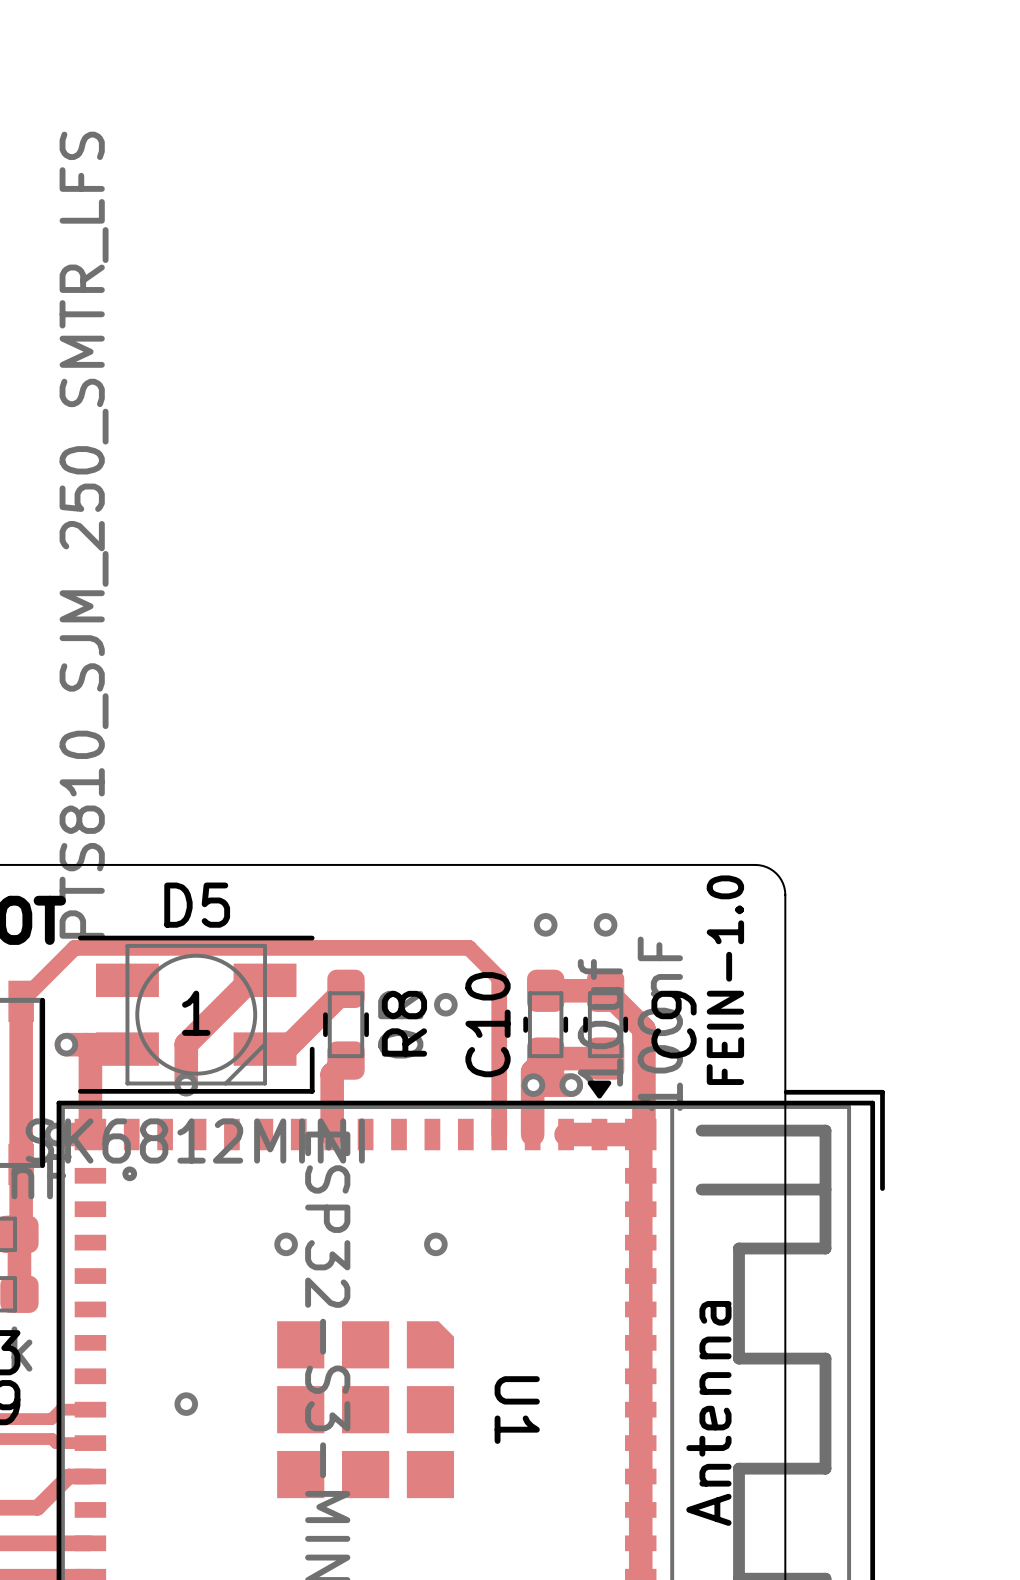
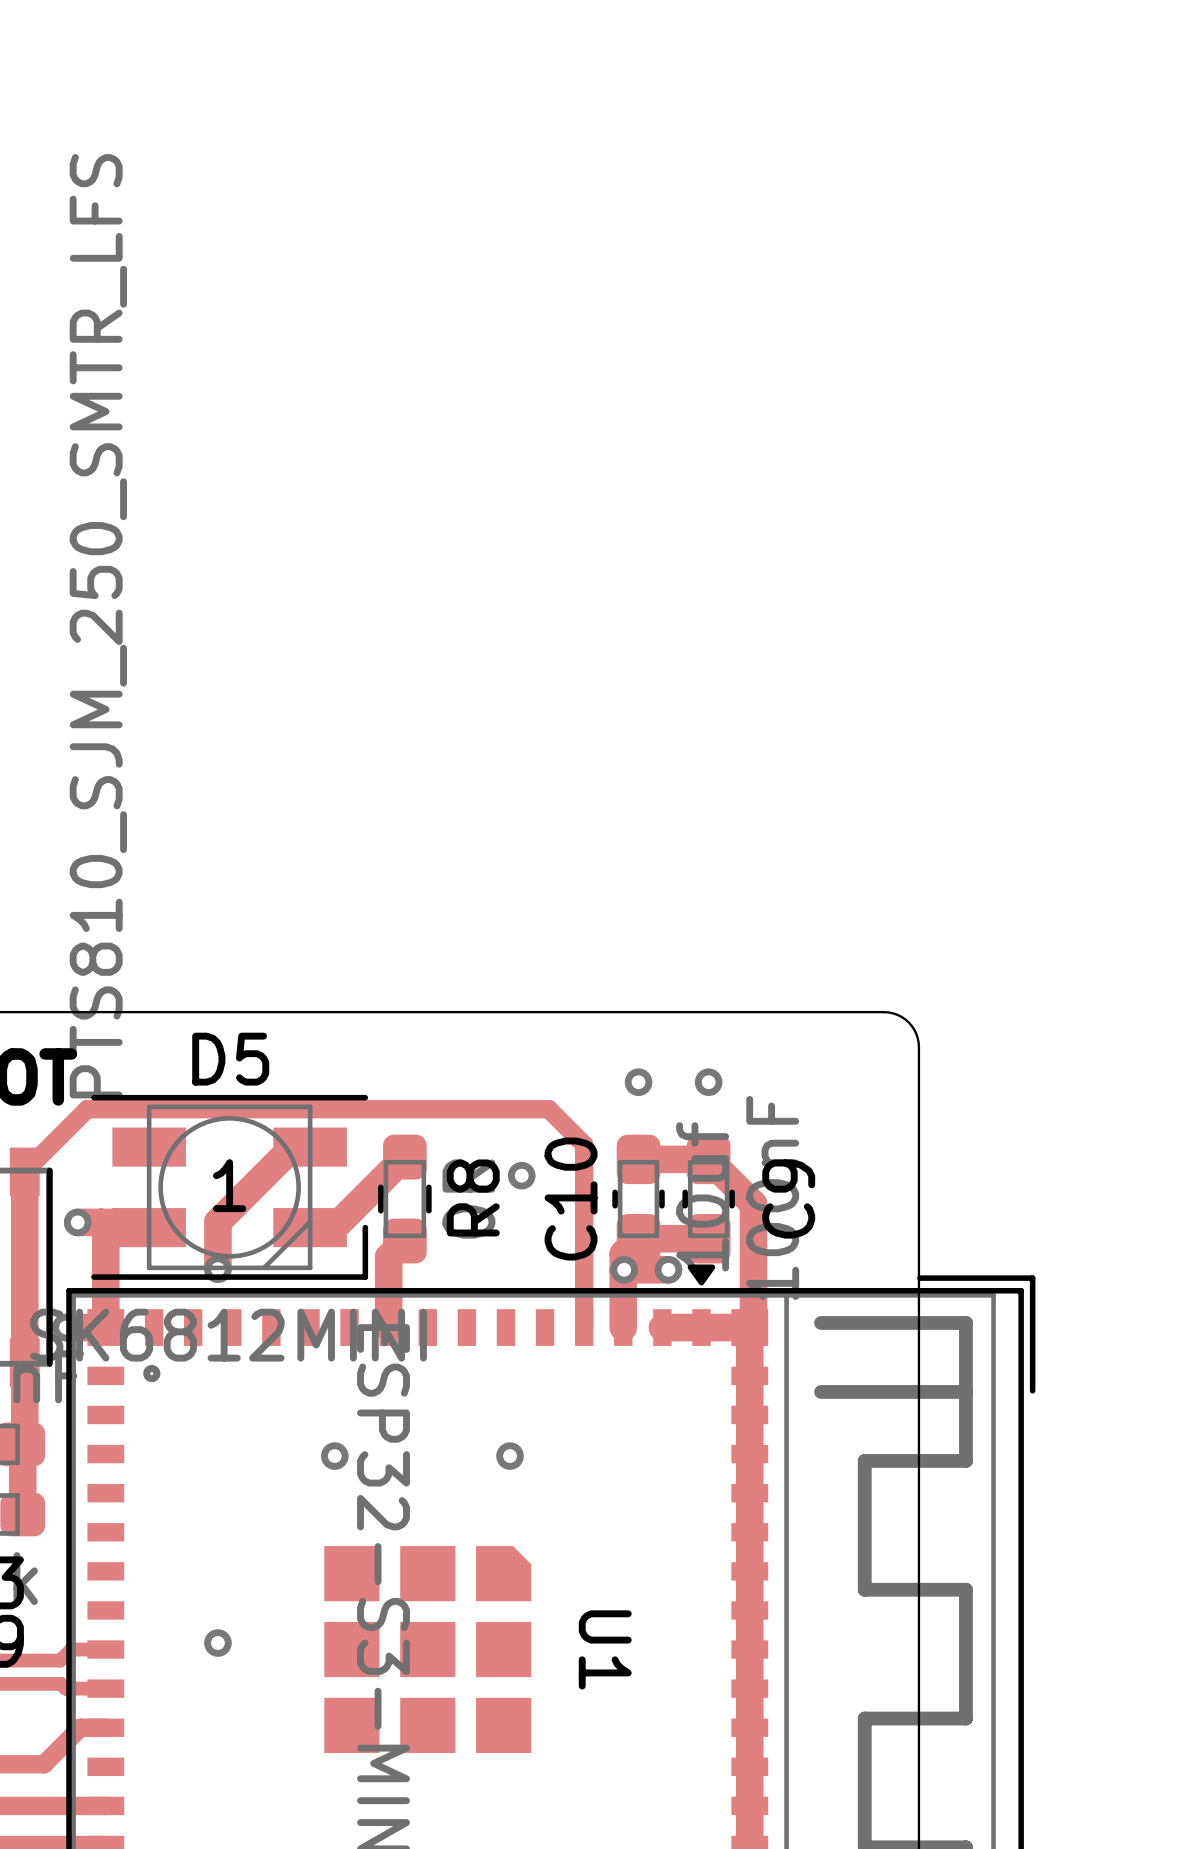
text: FEIN-1.0 (725, 980) -> none
U1 text: Antenna (708, 1413) -> none

